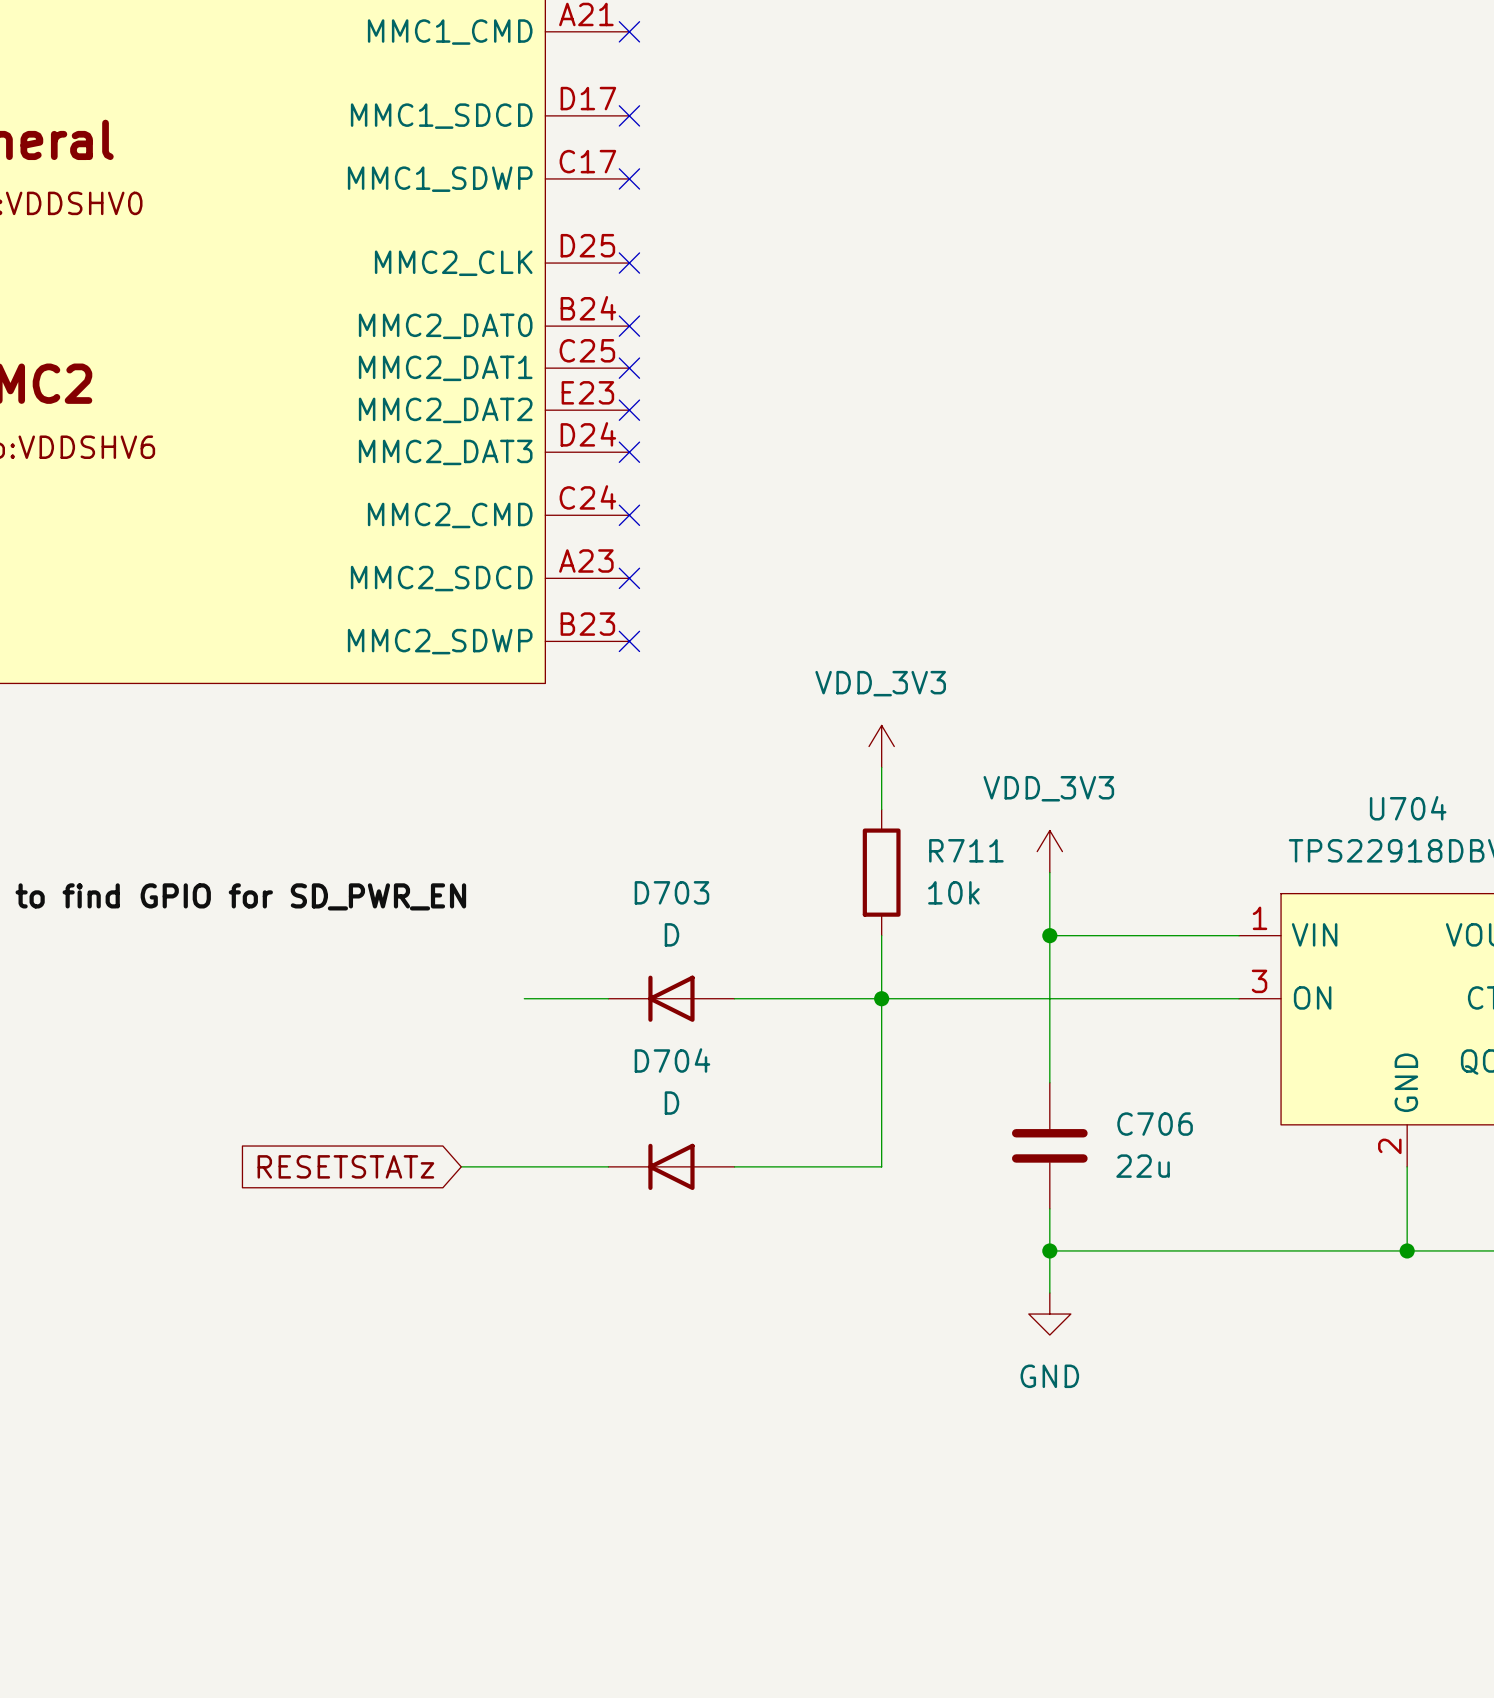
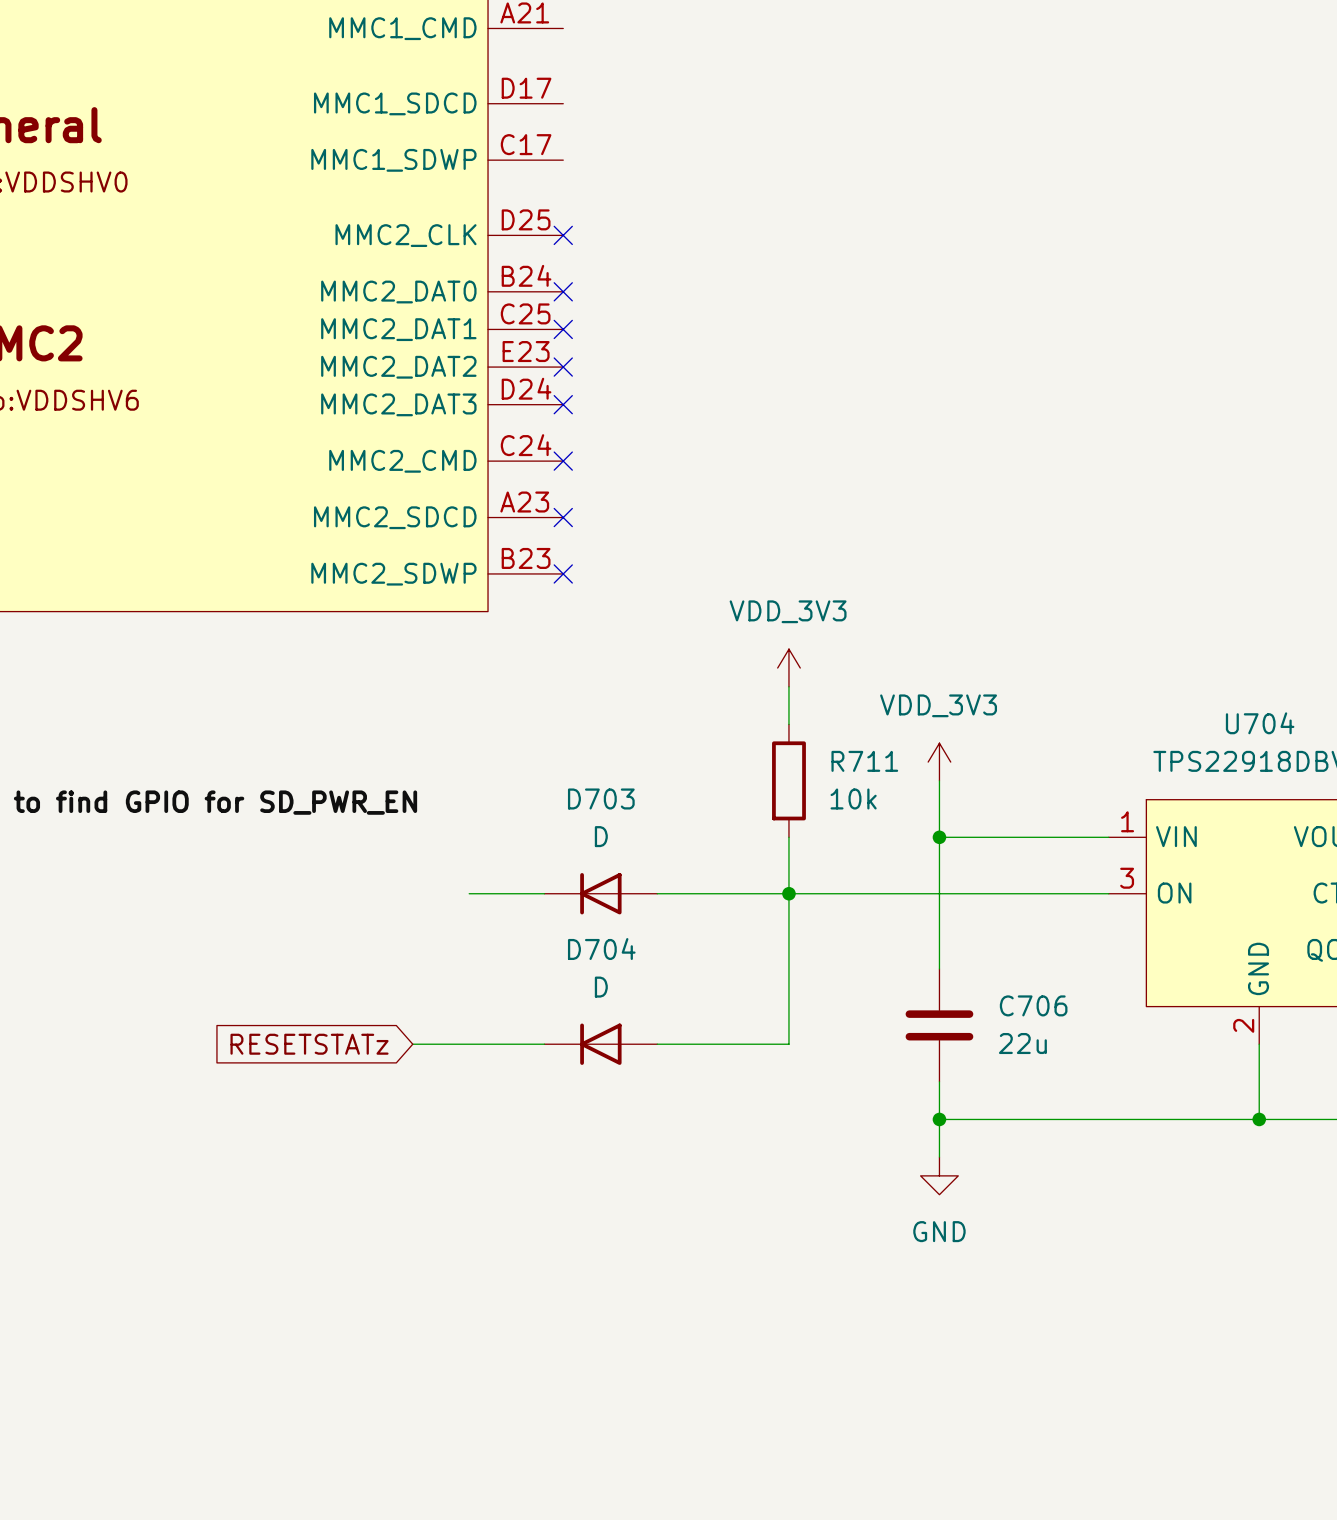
no-connect mark: (629, 31) -> none
no-connect mark: (629, 115) -> none
no-connect mark: (629, 178) -> none

